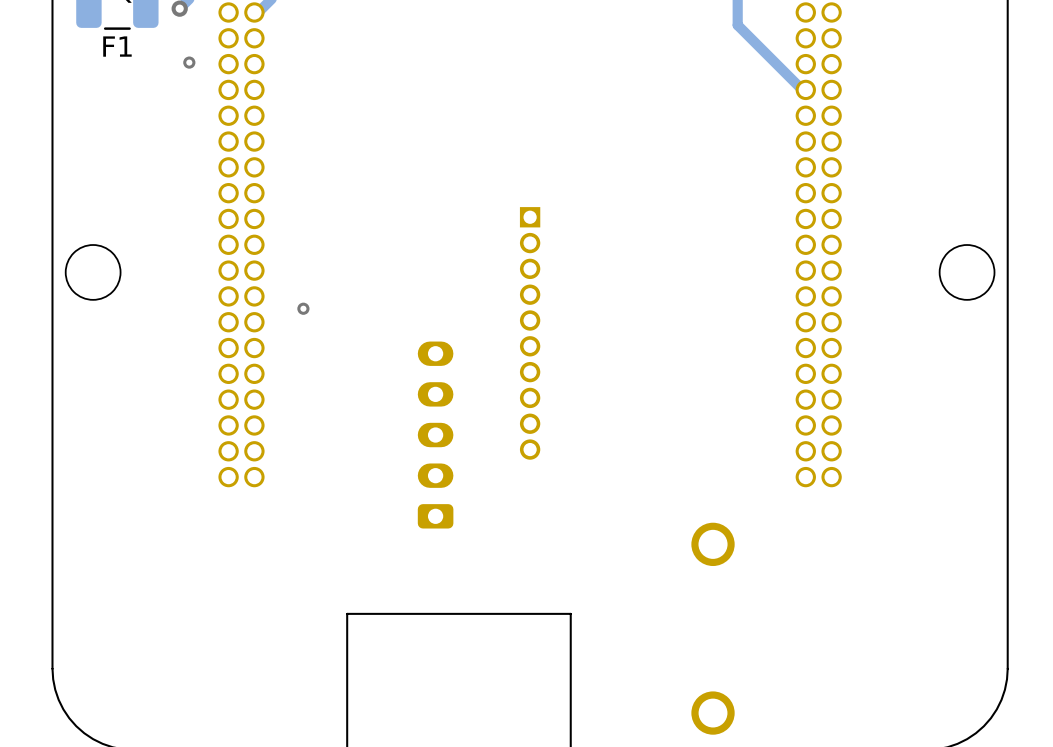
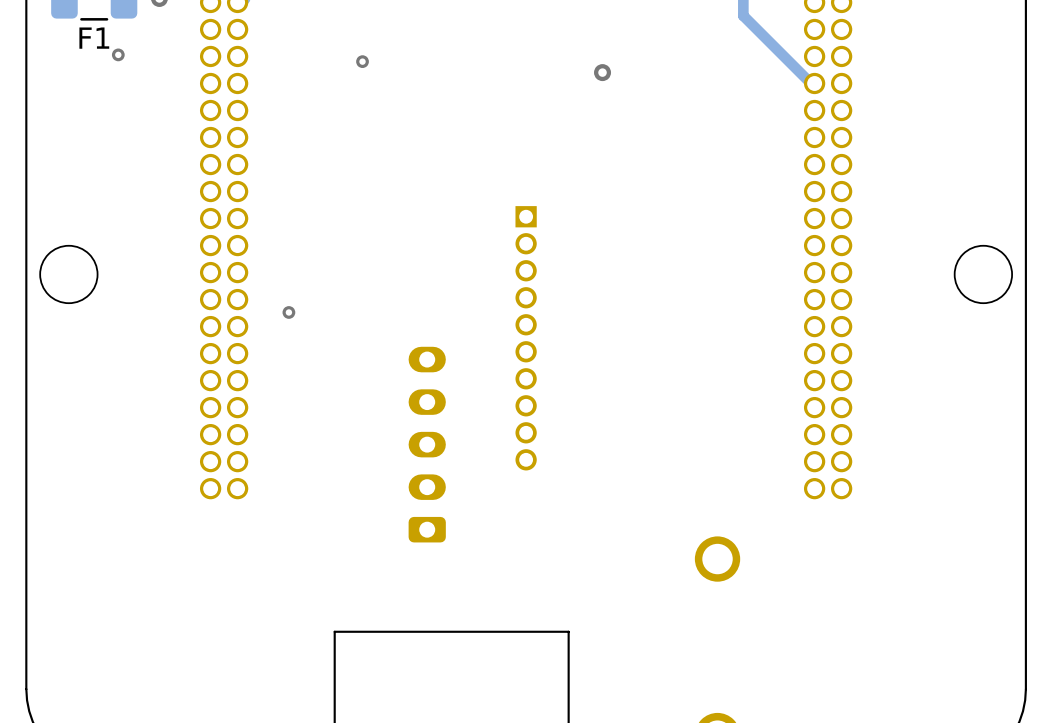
via: none -> (118, 54)
via: (189, 62) -> none
via: none -> (362, 61)
via: none -> (602, 72)

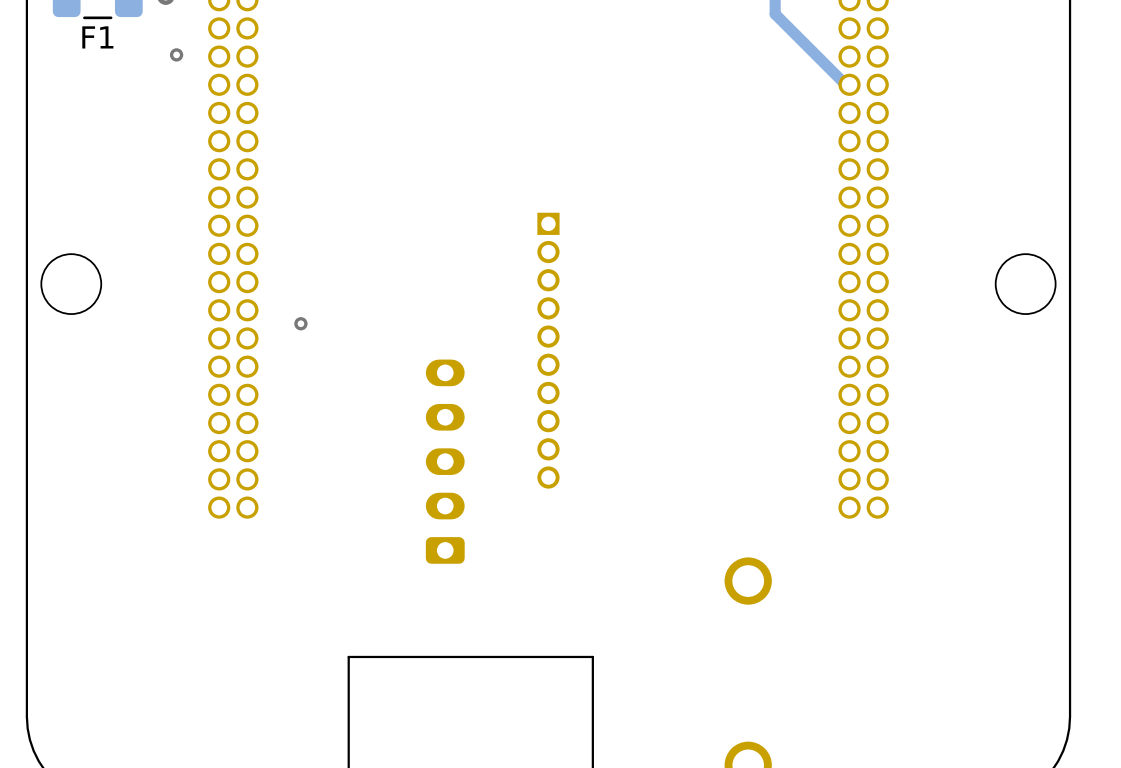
via position: (118, 54) -> (176, 54)
via: (362, 61) -> none
via: (602, 72) -> none

